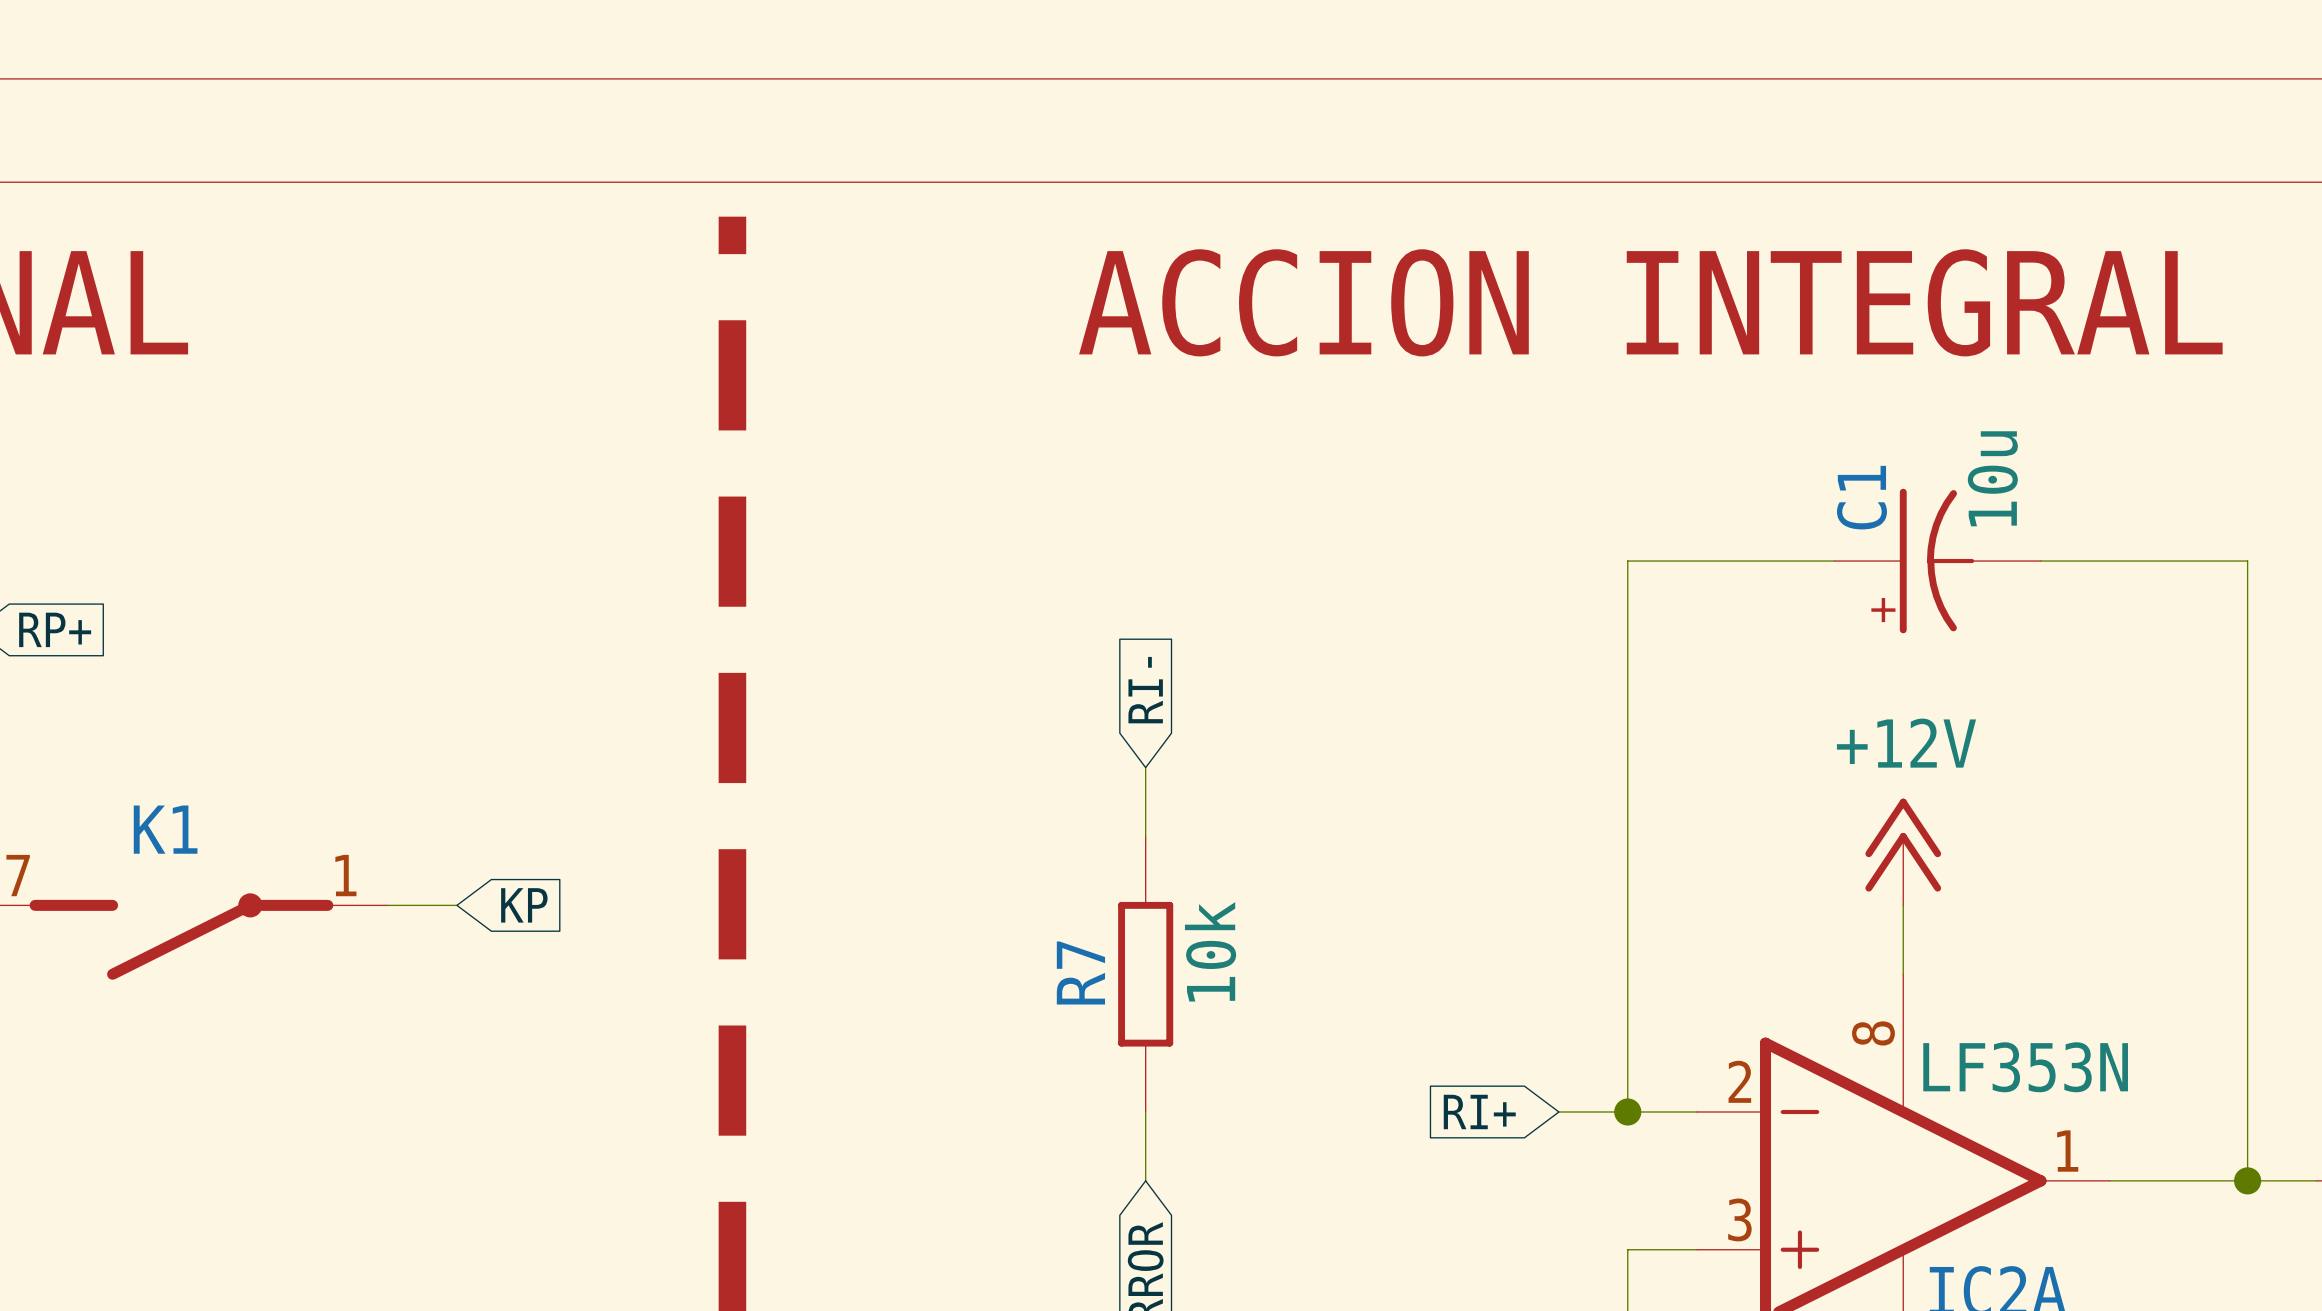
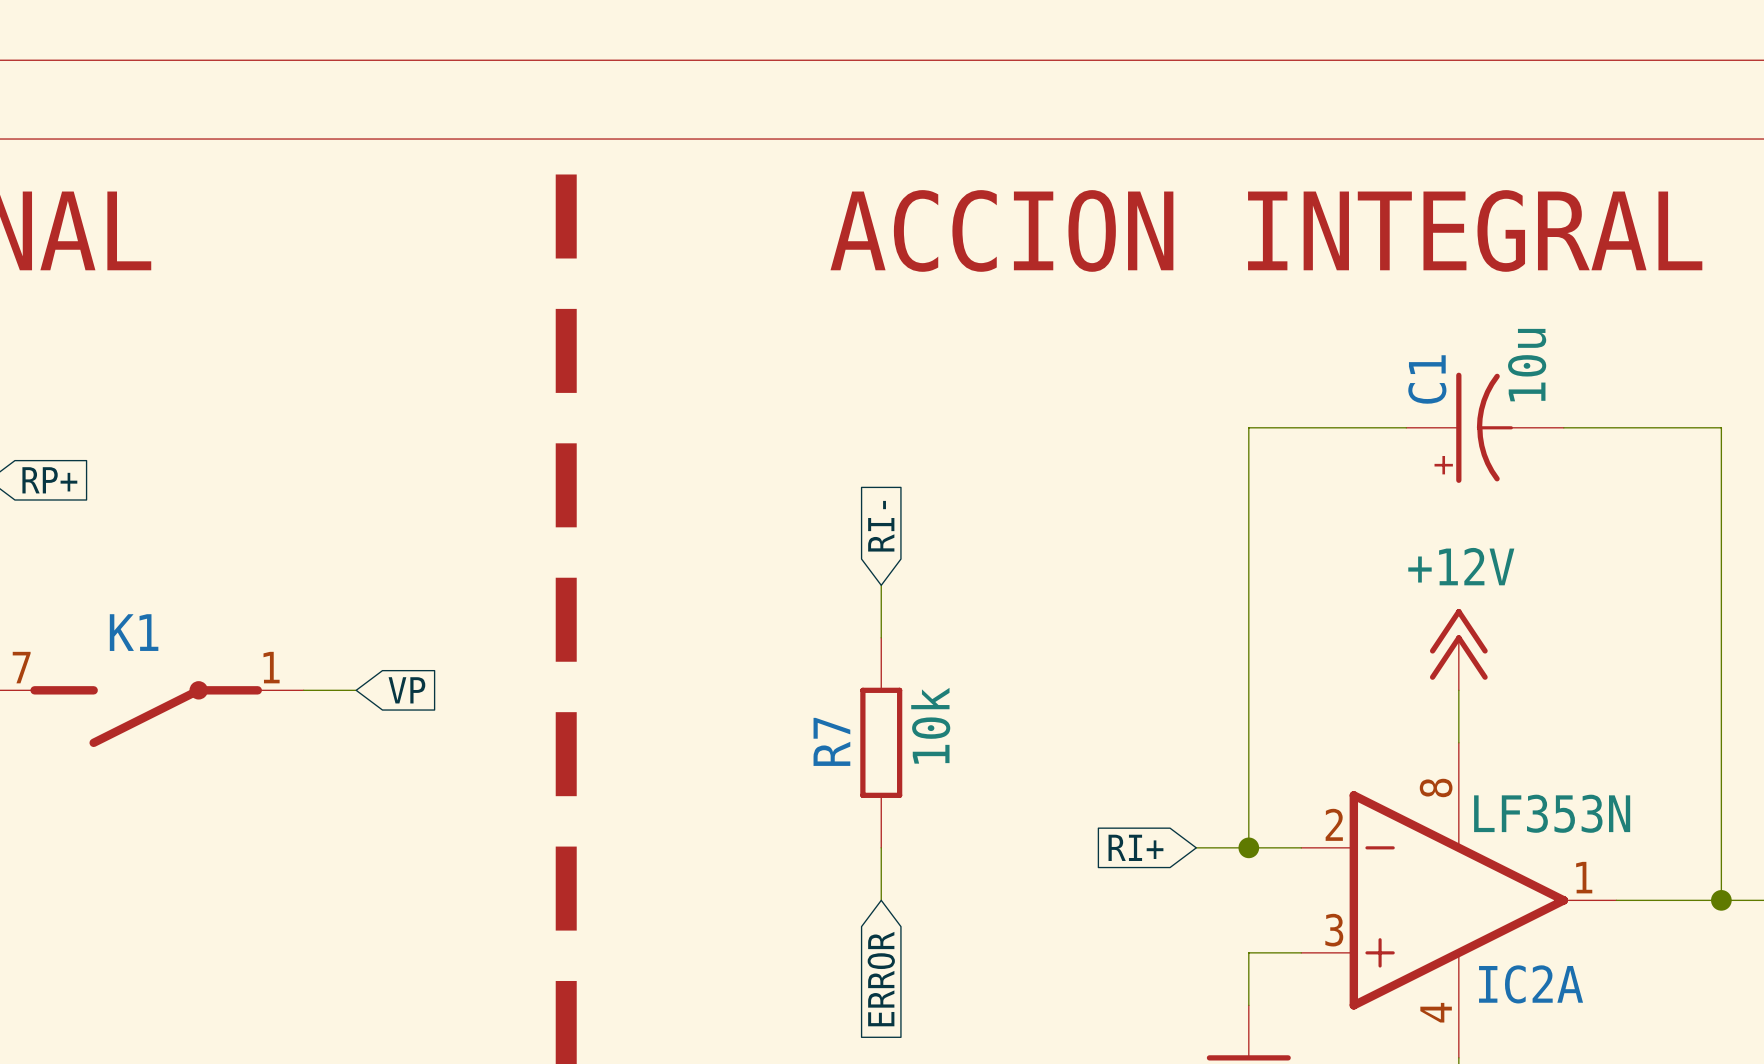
global label: KP (524, 905) -> VP (406, 690)

